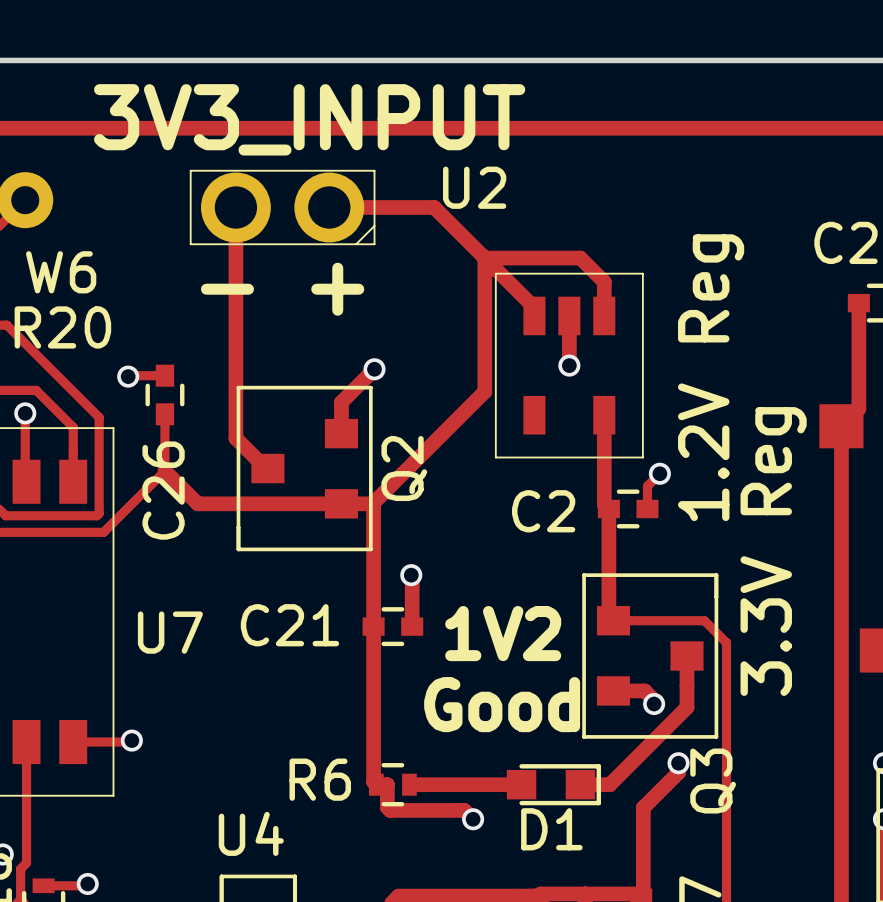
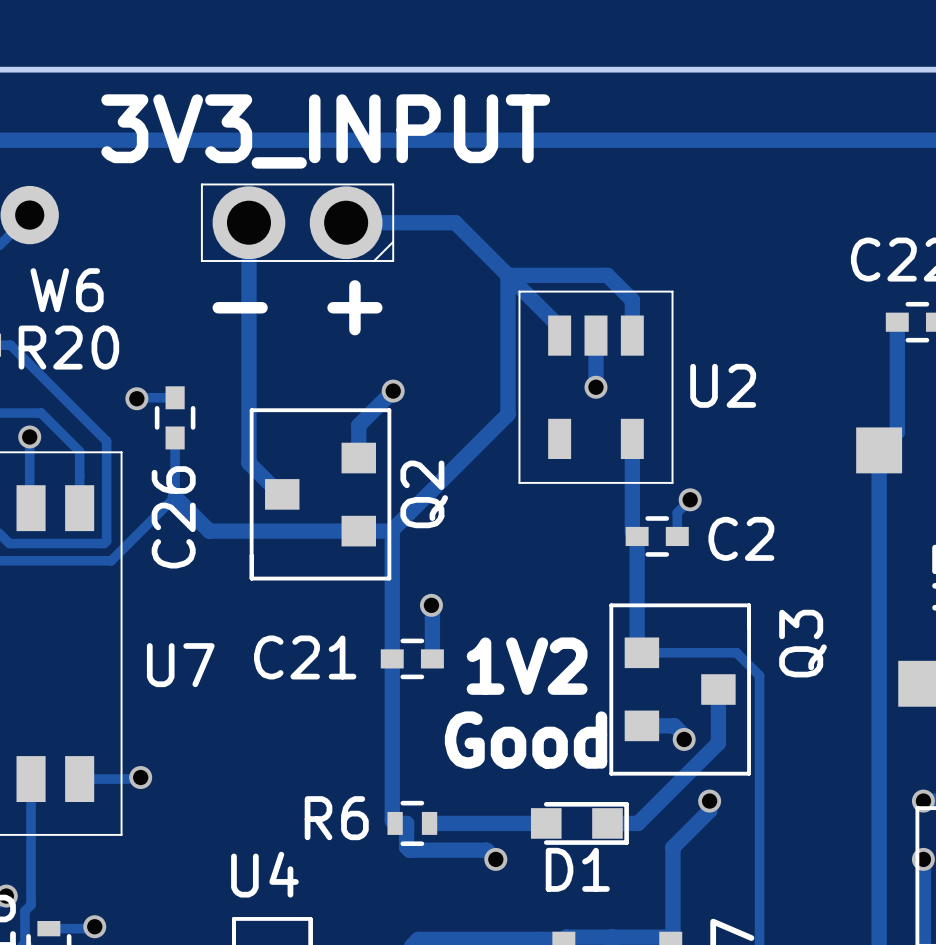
U2 name position: U2 (474, 187) -> U2 (723, 385)
text: 1.2V Reg (711, 377) -> none
C2 name position: C2 (543, 511) -> C2 (741, 538)
text: 3.3V Reg (773, 551) -> none
Q3 name position: Q3 (713, 781) -> Q3 (802, 643)

